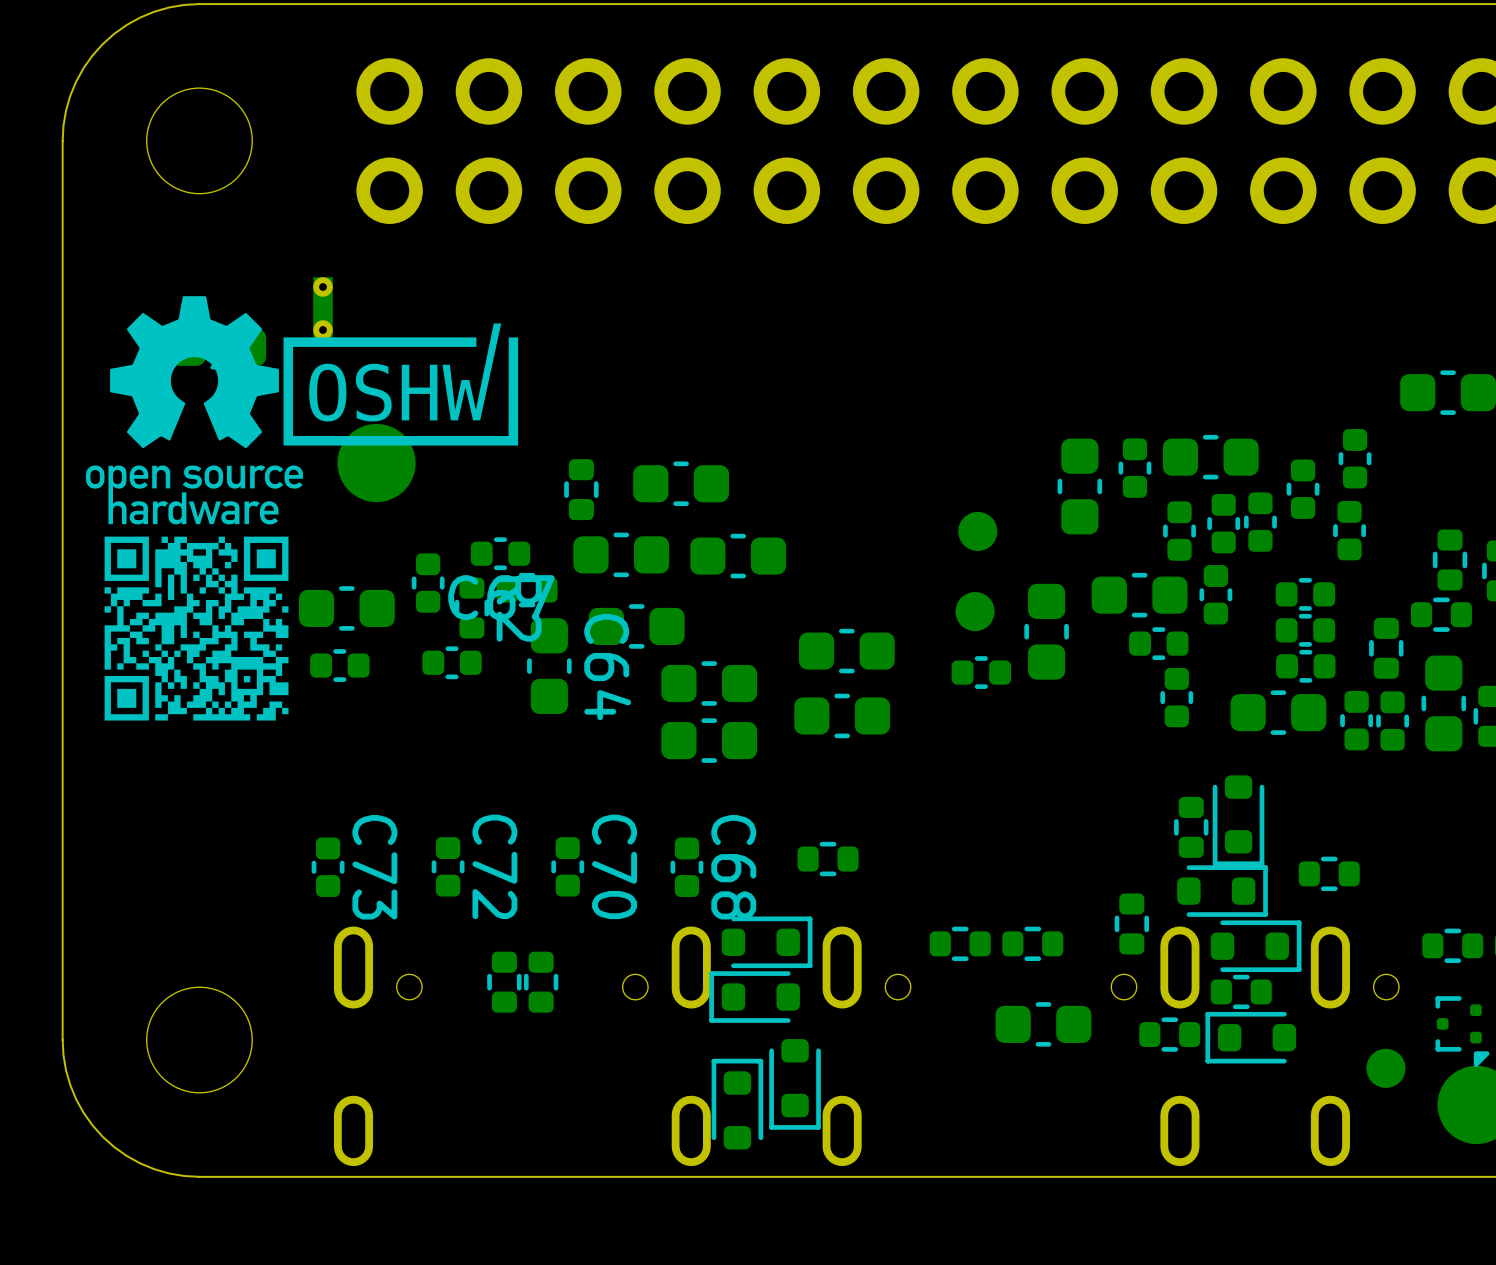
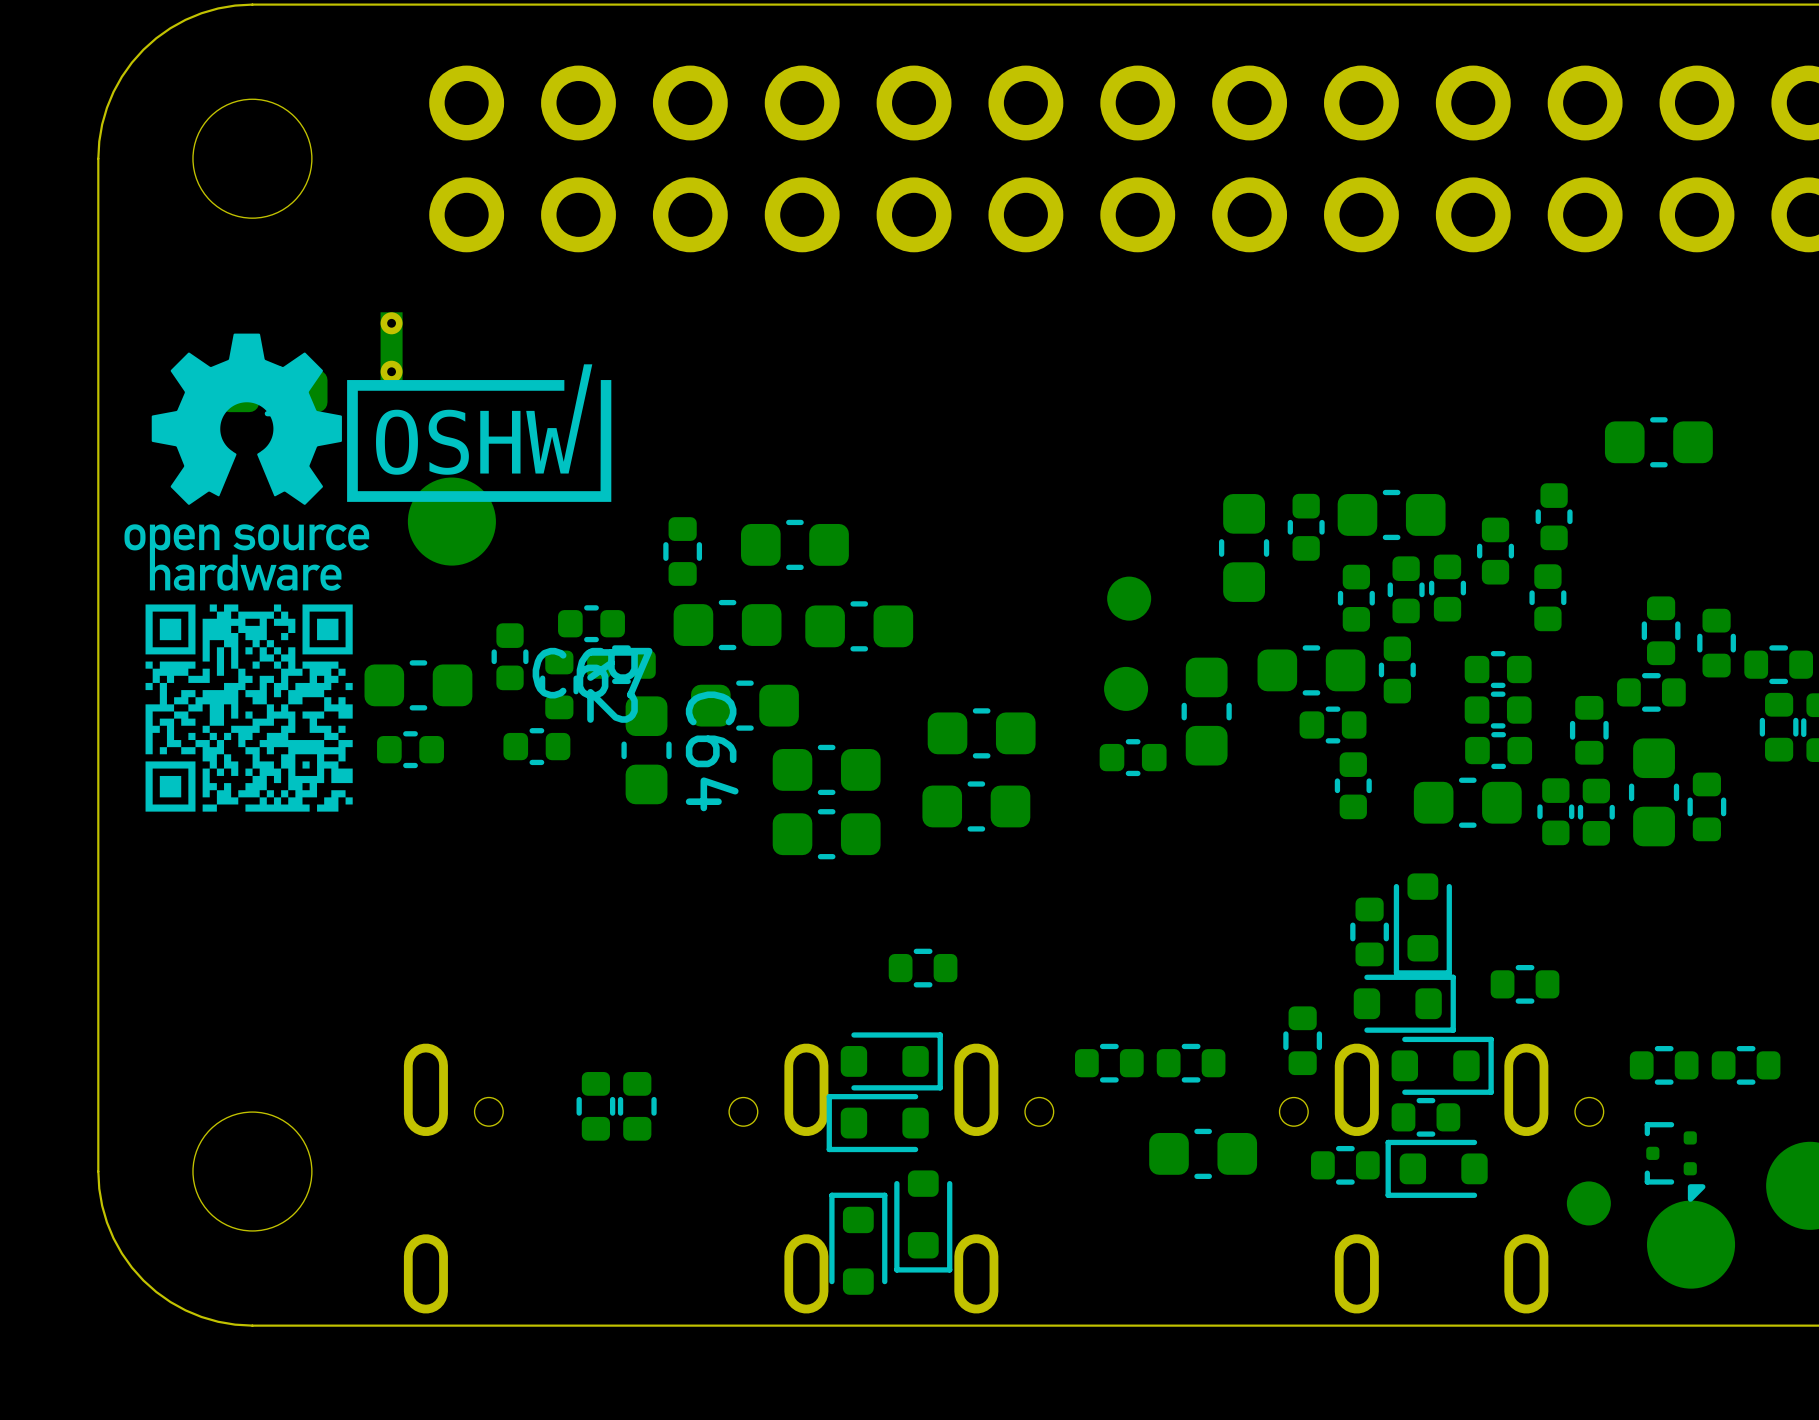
part position: (828, 859) -> (923, 968)
C72: (448, 866) -> none
C70: (567, 866) -> none
C73: (328, 867) -> none
C68: (686, 867) -> none

